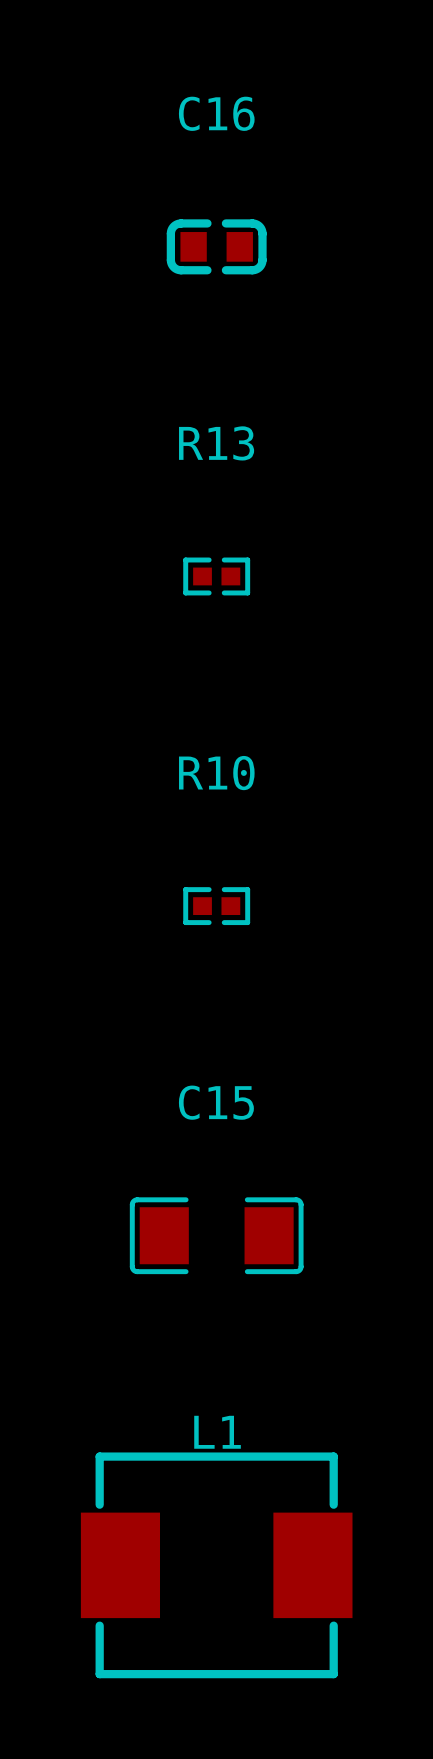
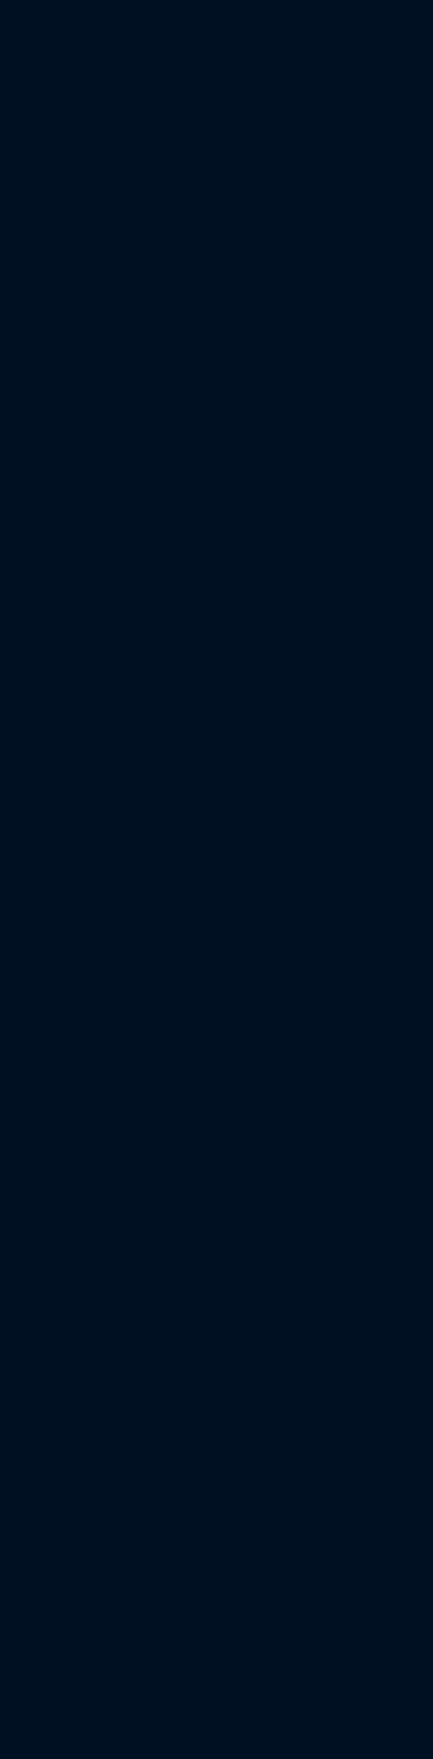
C16: (216, 246) -> none
R13: (216, 576) -> none
R10: (216, 906) -> none
C15: (216, 1235) -> none
L1: (216, 1565) -> none

